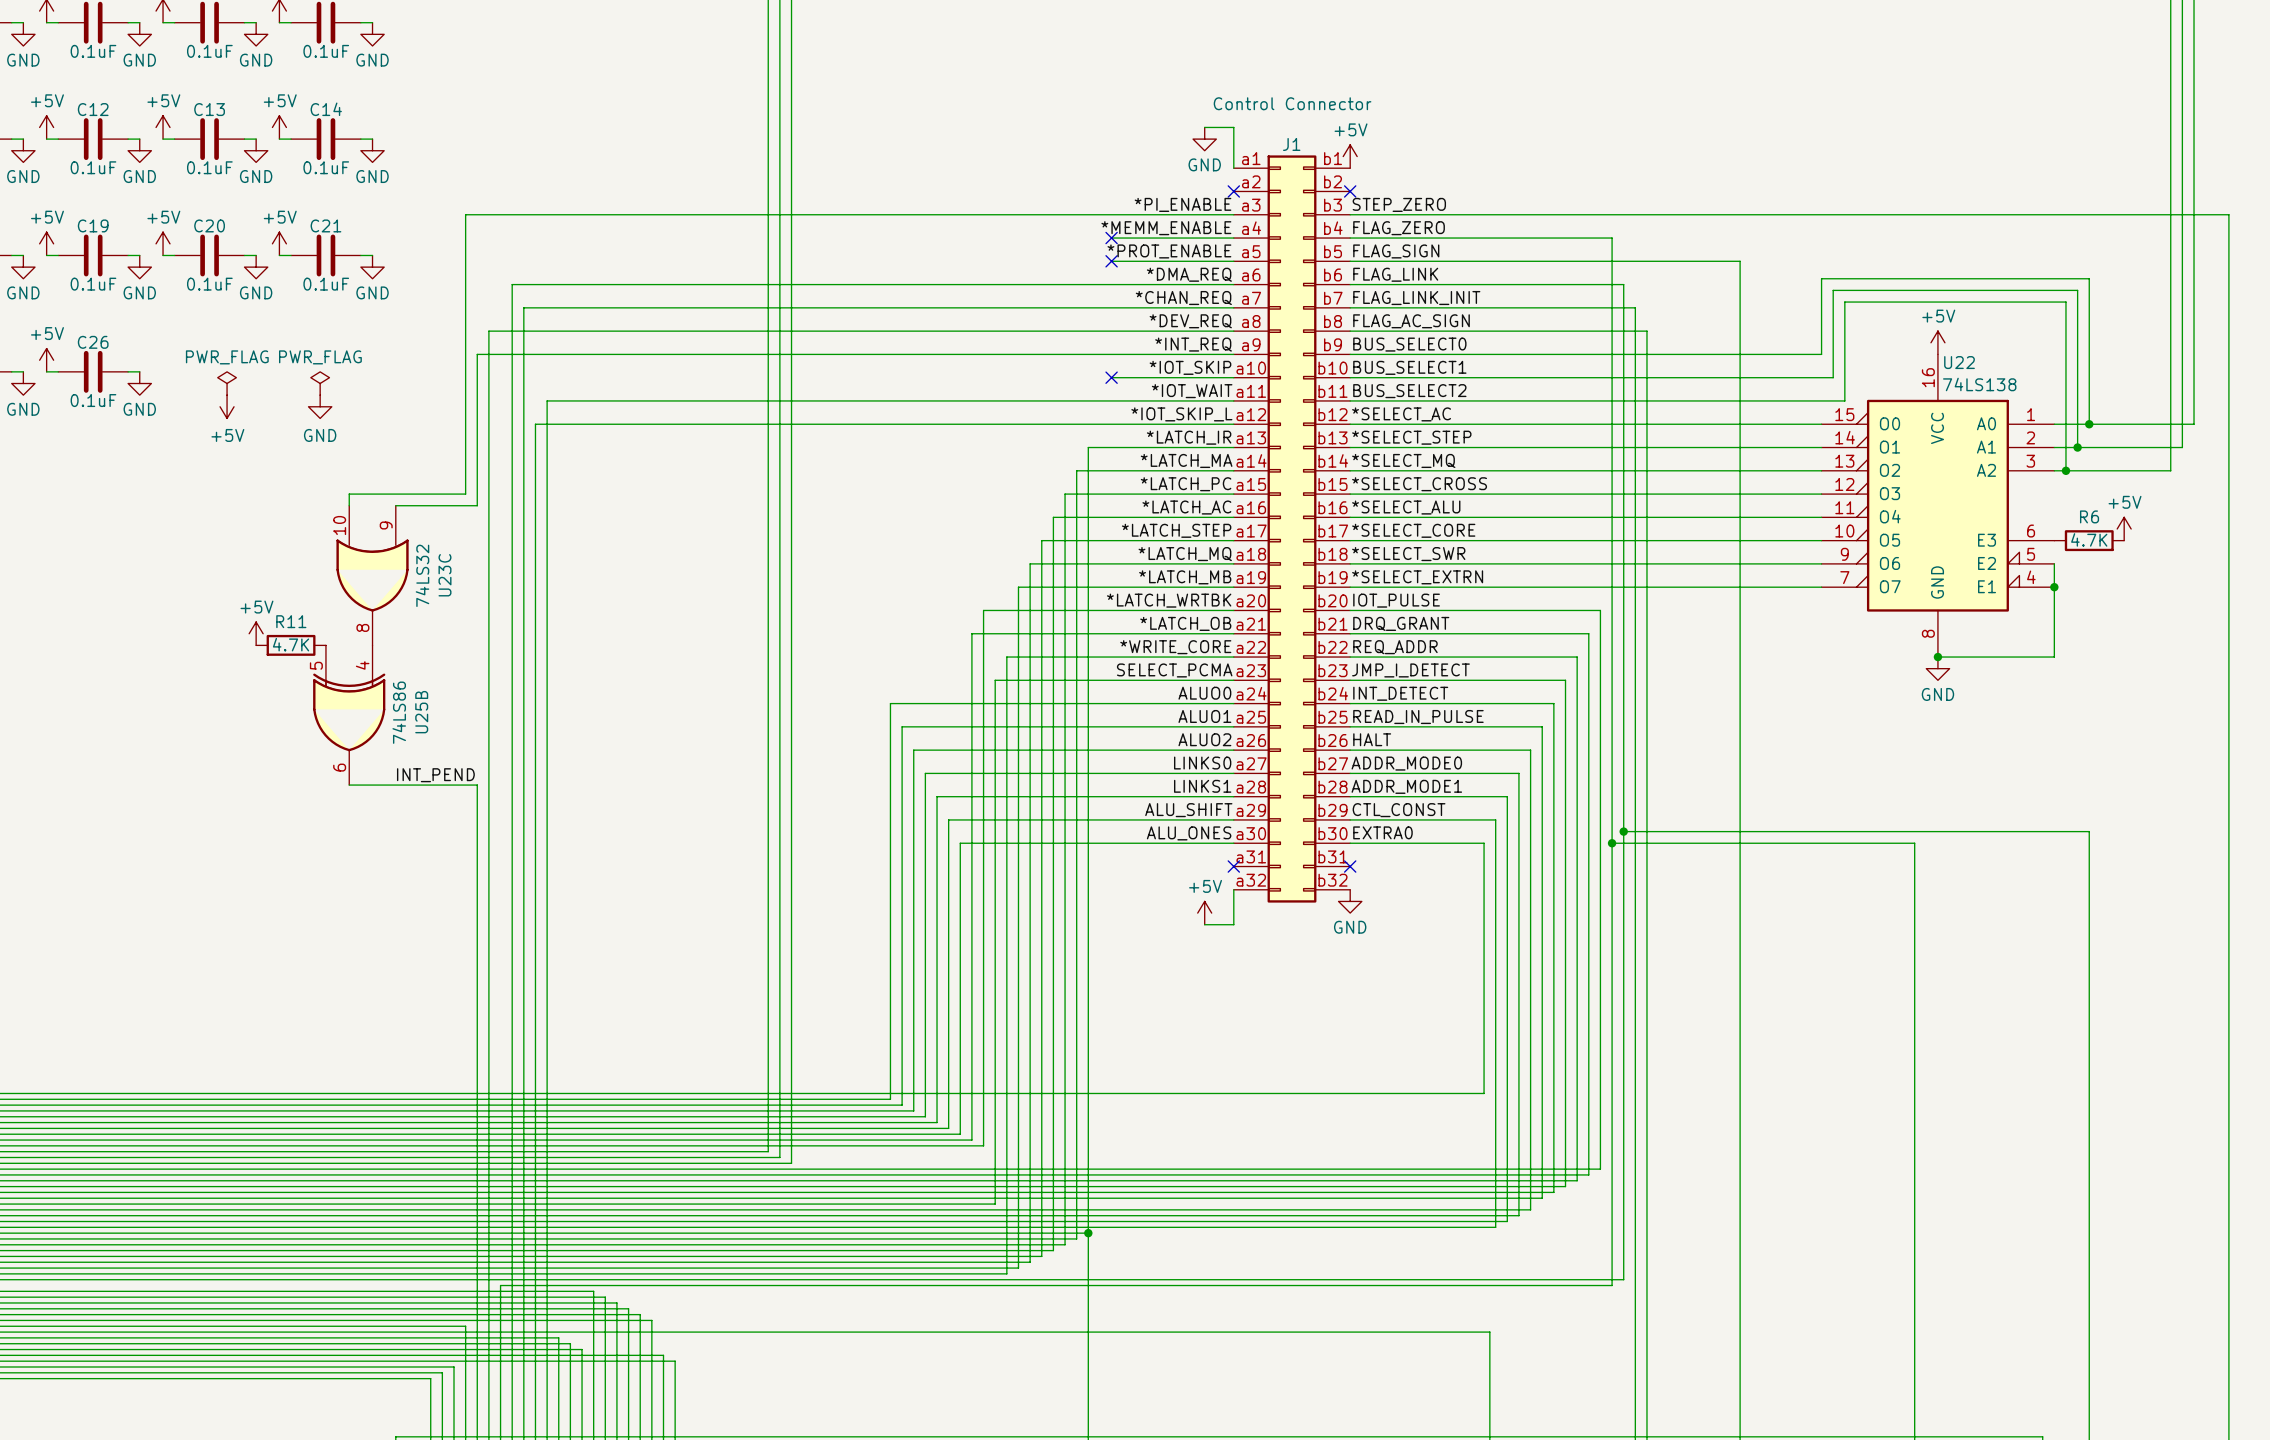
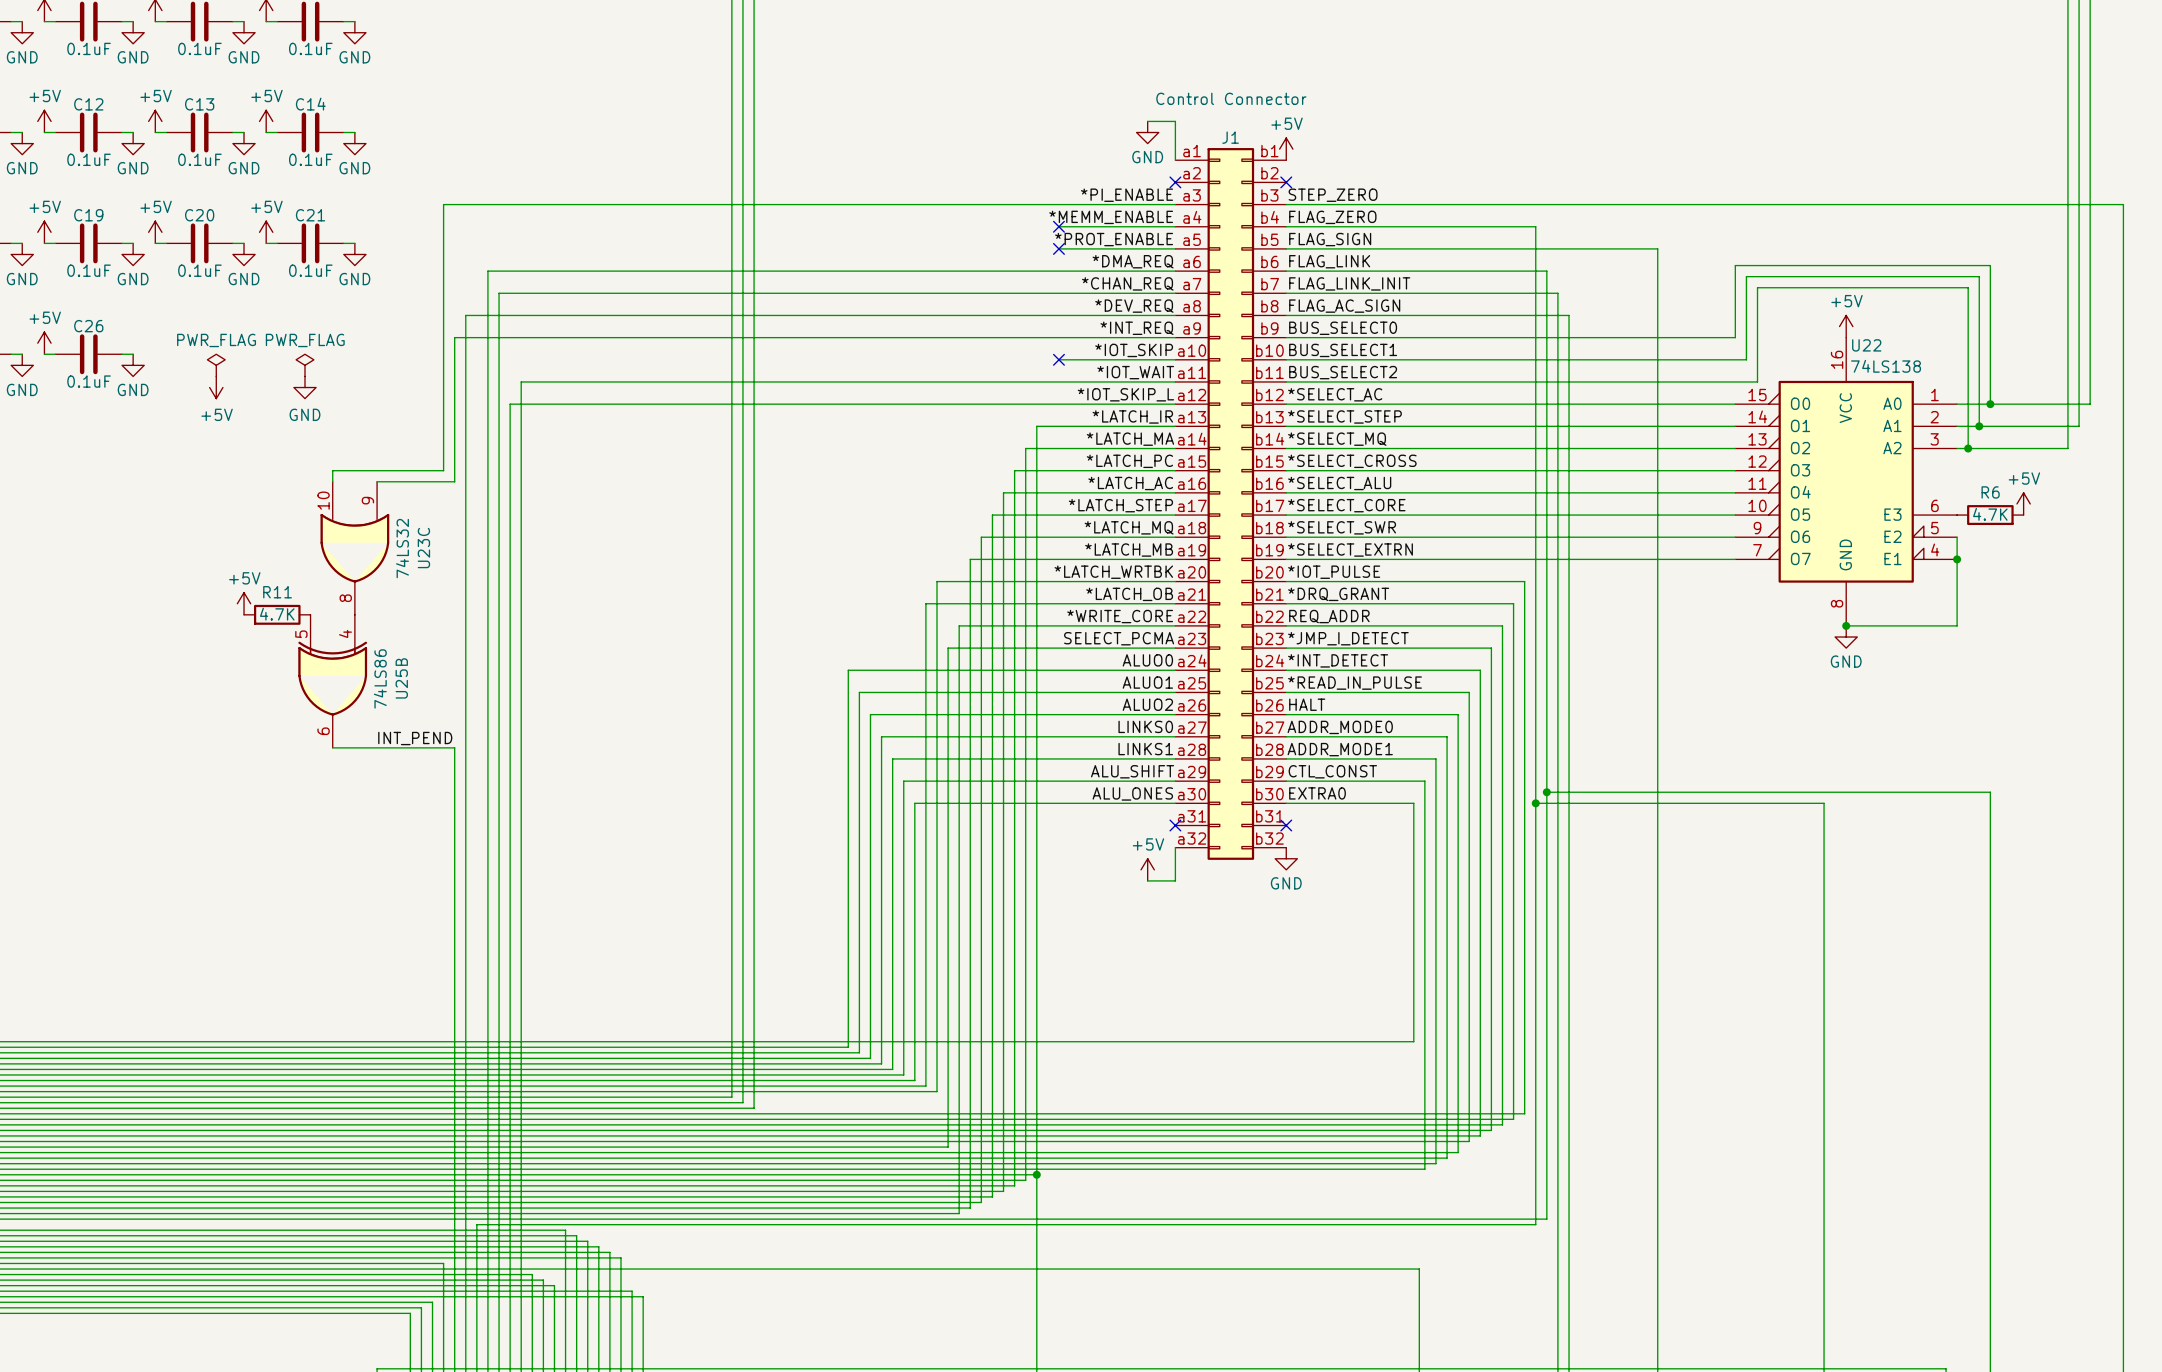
label: IOT_PULSE (1396, 600) -> *IOT_PULSE (1334, 572)
label: DRQ_GRANT (1401, 623) -> *DRQ_GRANT (1338, 594)
label: JMP_I_DETECT (1410, 670) -> *JMP_I_DETECT (1348, 638)
label: INT_DETECT (1400, 693) -> *INT_DETECT (1338, 660)
label: READ_IN_PULSE (1418, 717) -> *READ_IN_PULSE (1354, 683)

